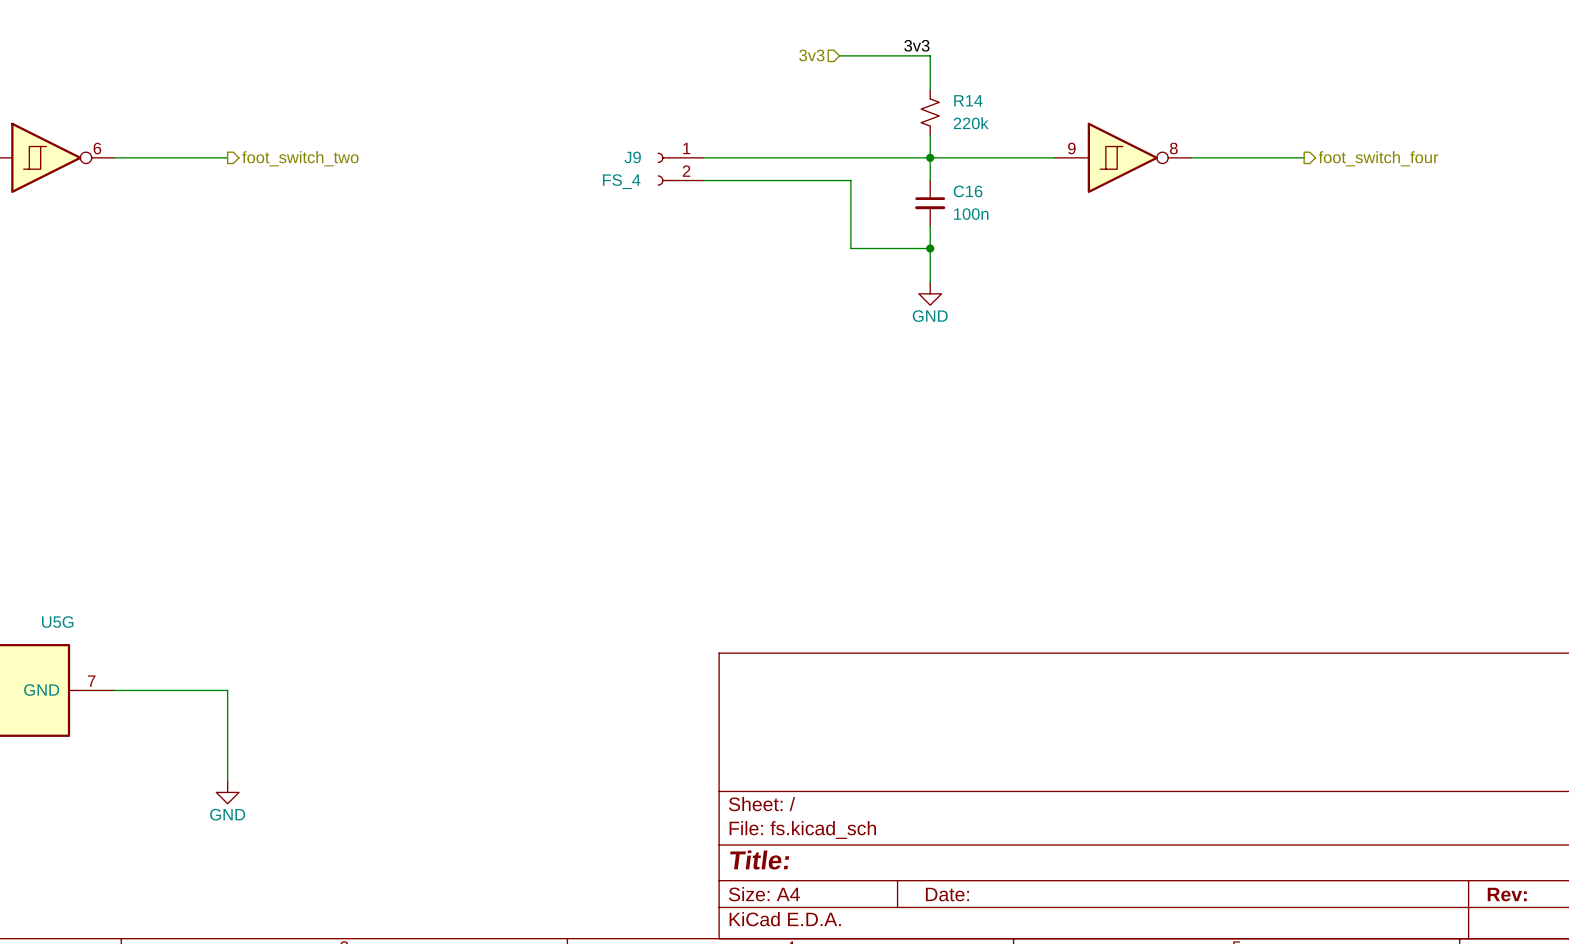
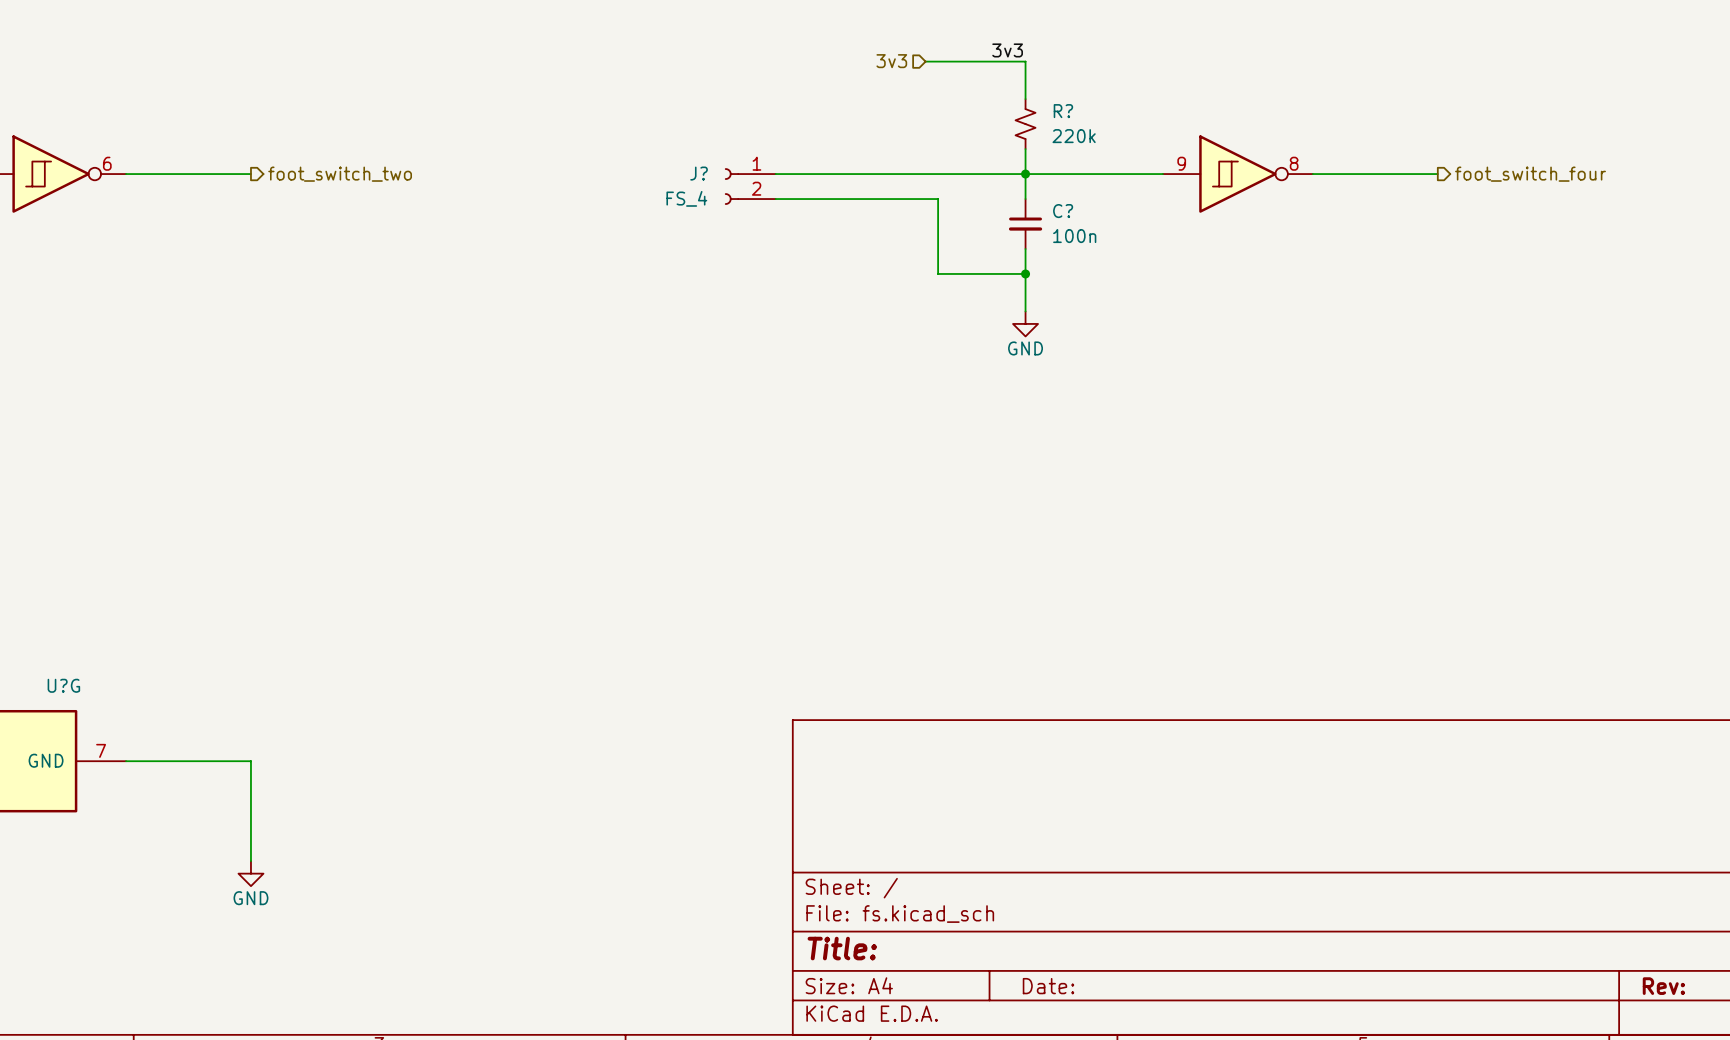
R14 name: R14 (968, 100) -> R? (1063, 111)
J9 name: J9 (632, 157) -> J? (699, 173)
C16 name: C16 (968, 191) -> C? (1063, 211)
U5G name: U5G (57, 622) -> U?G (63, 685)

